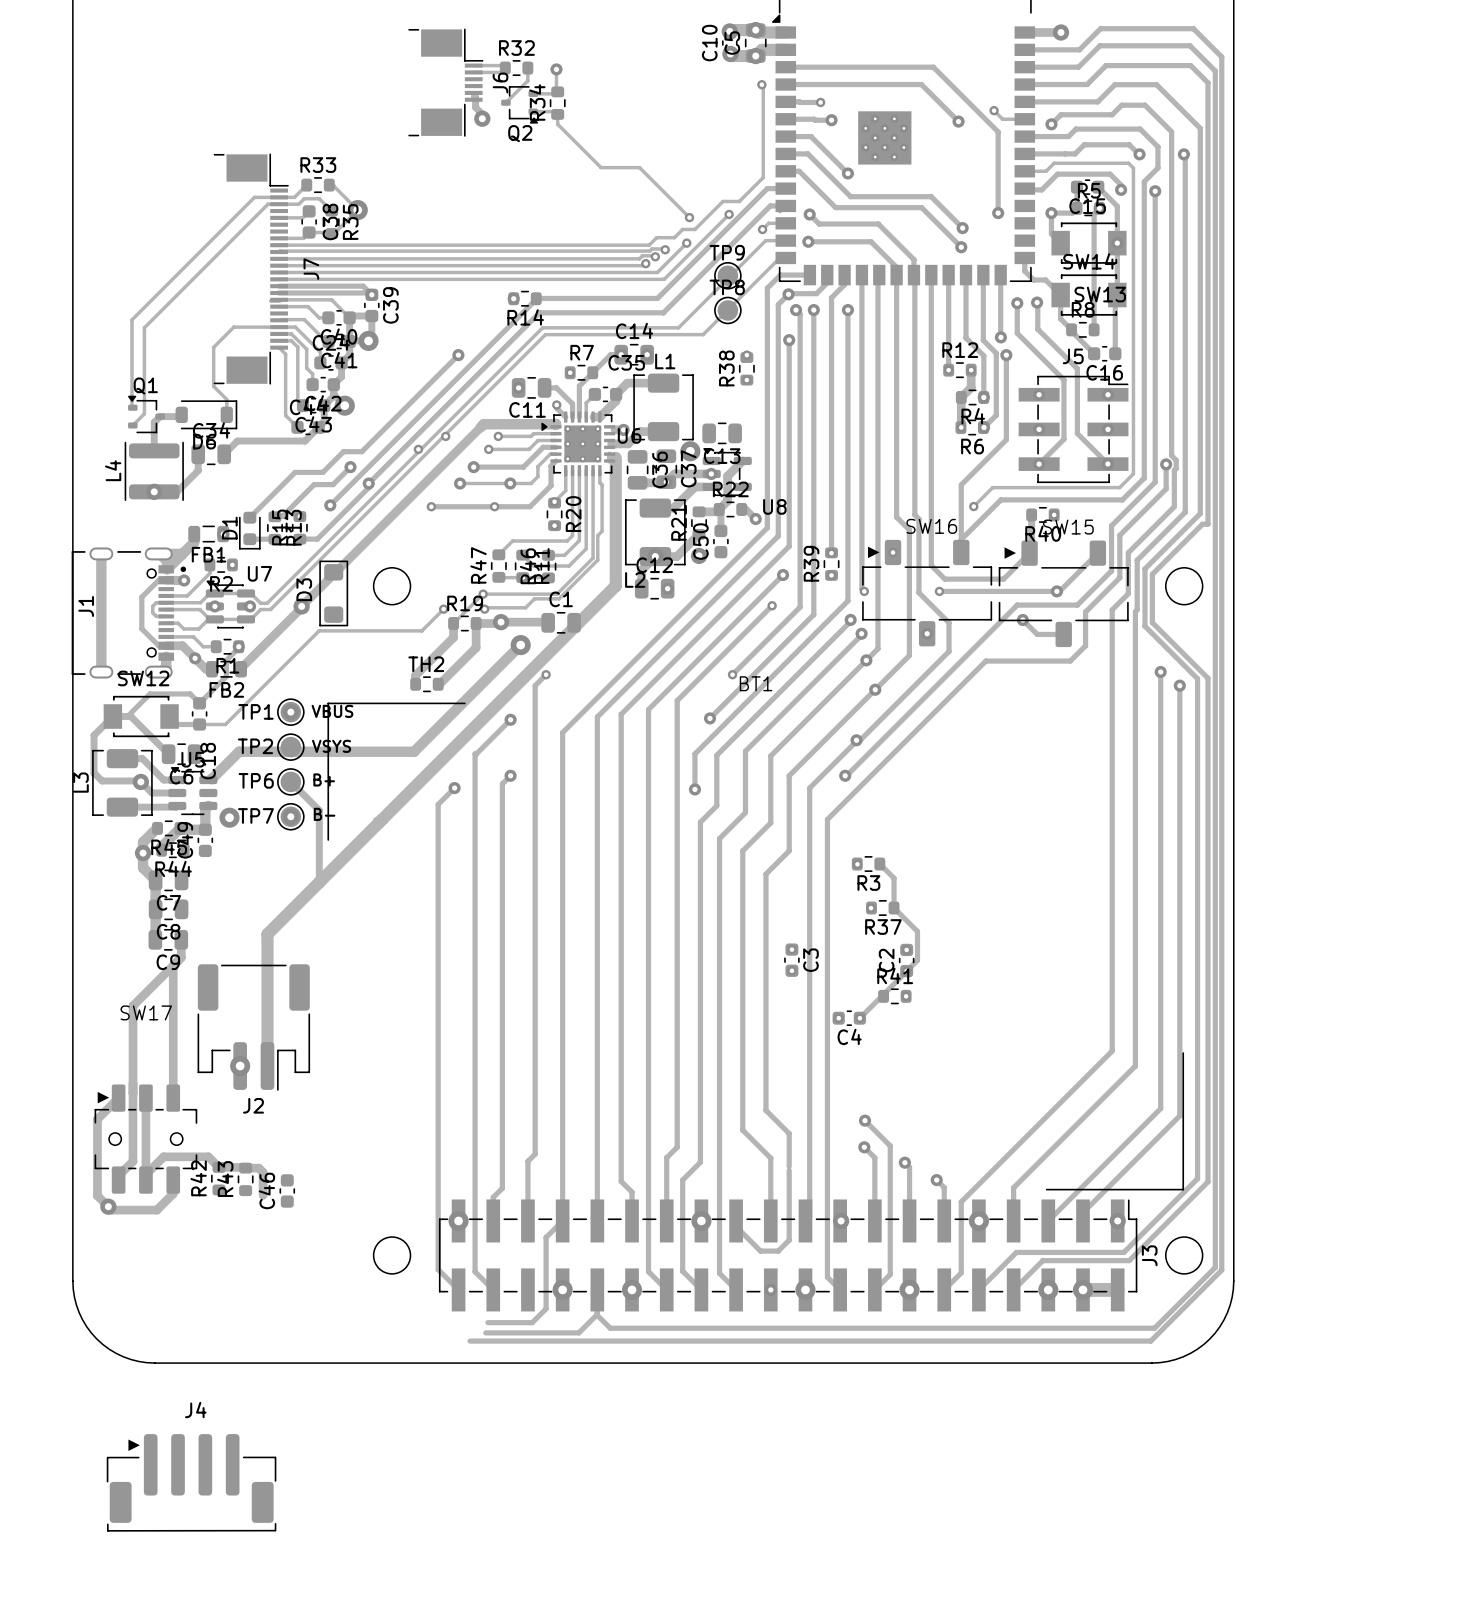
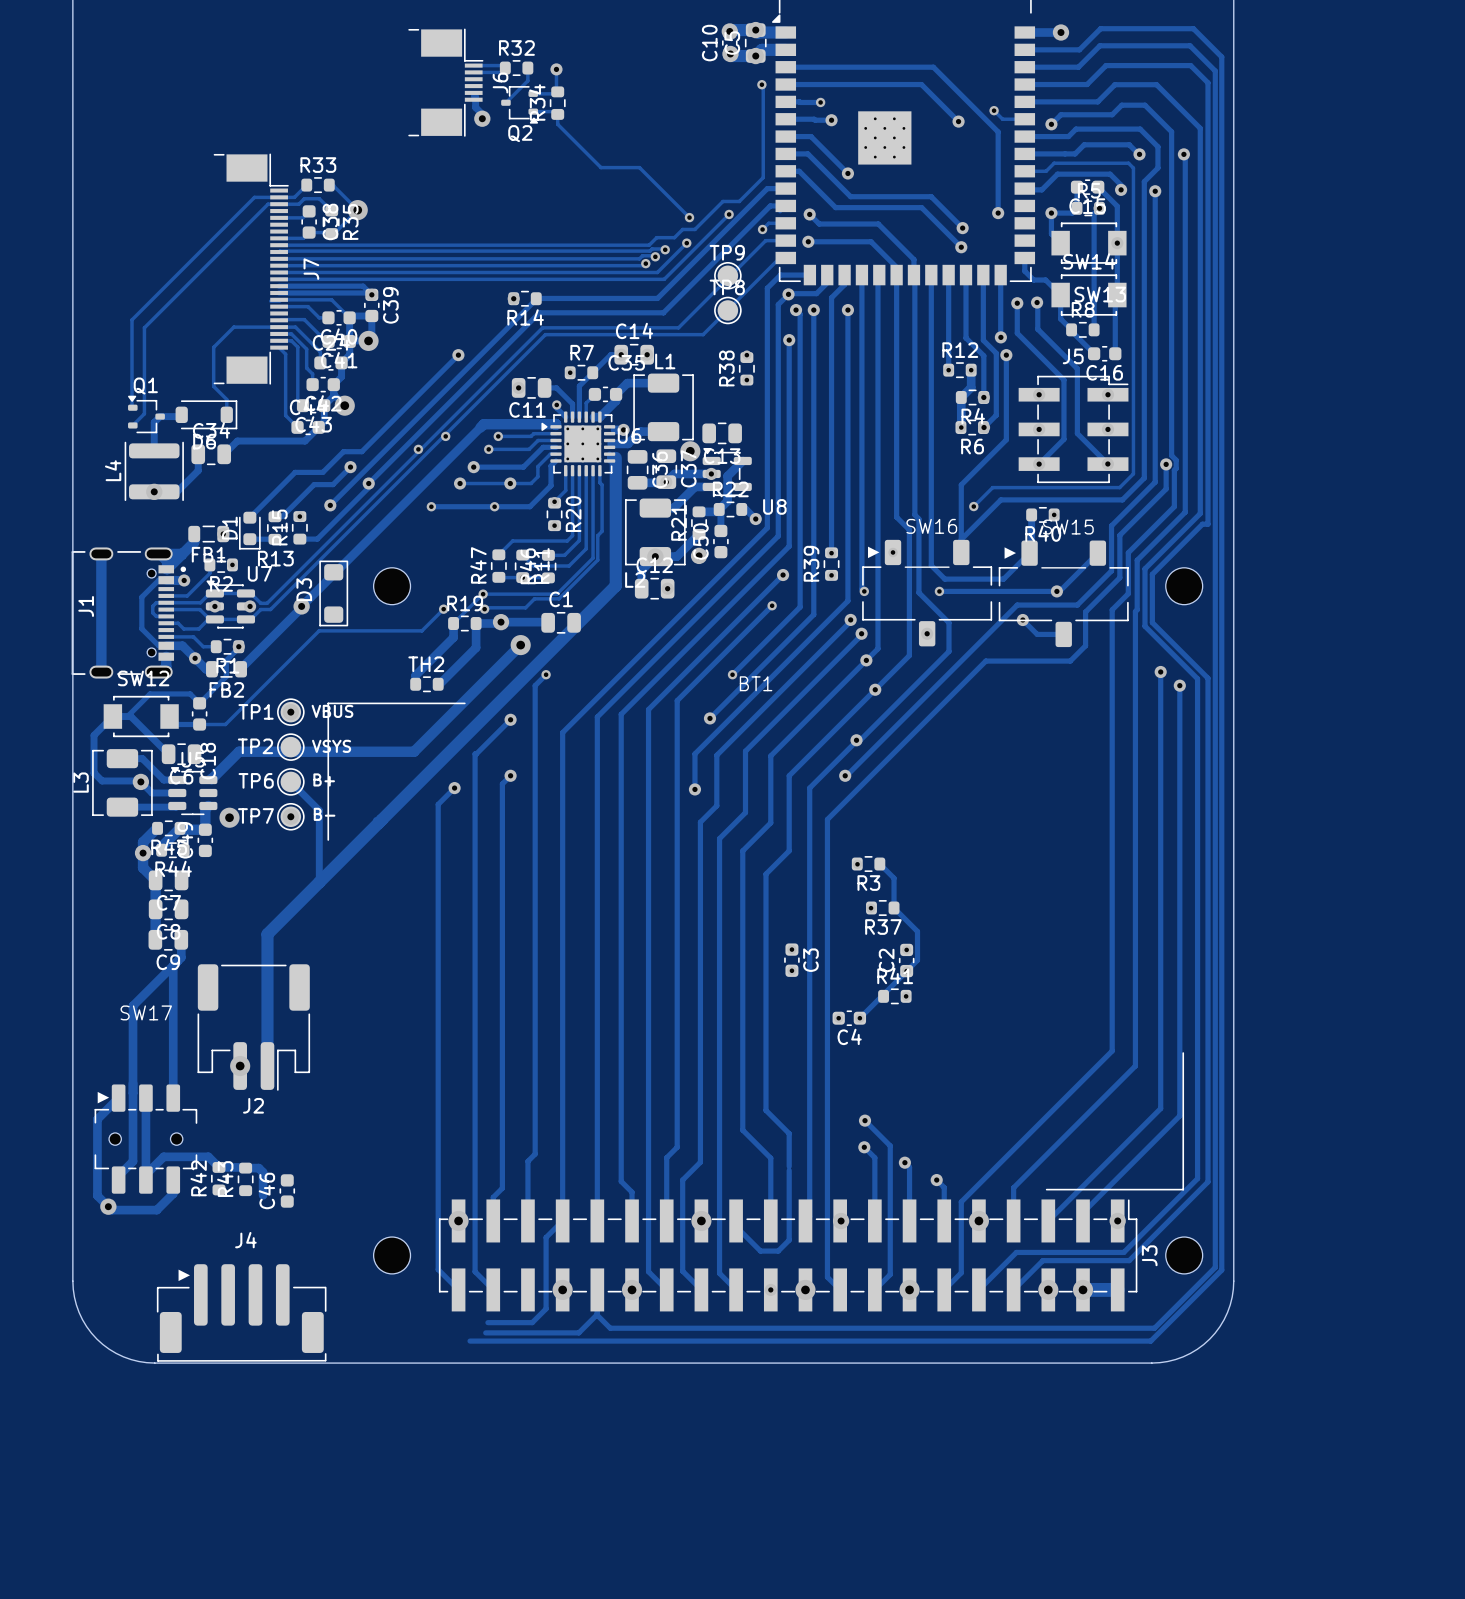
R13 name rotation: 0° (294, 527) -> 90° clockwise (275, 558)
J4 position: (191, 1482) -> (241, 1313)

